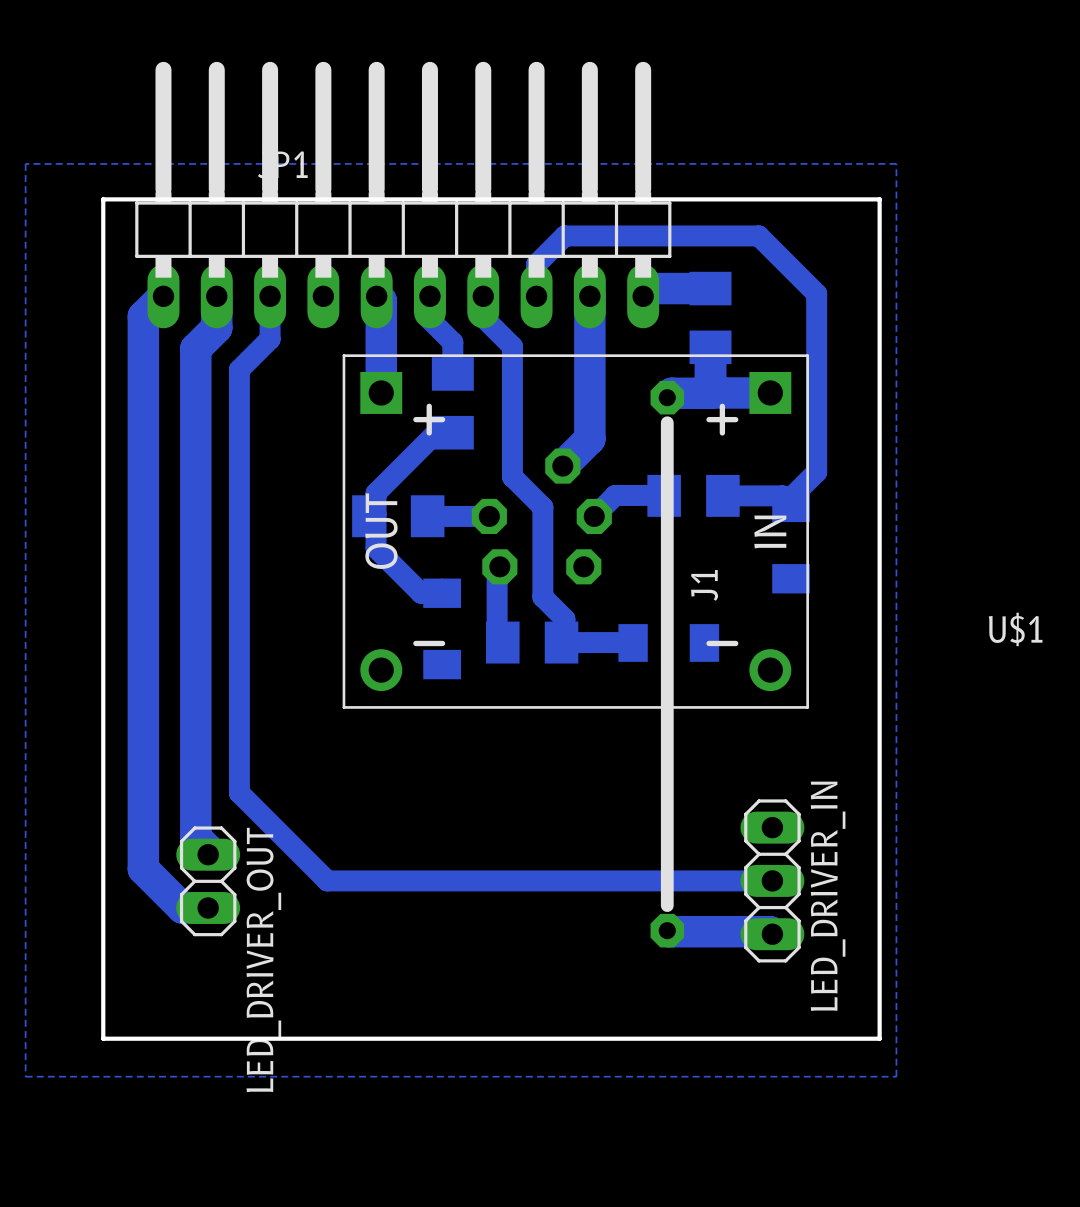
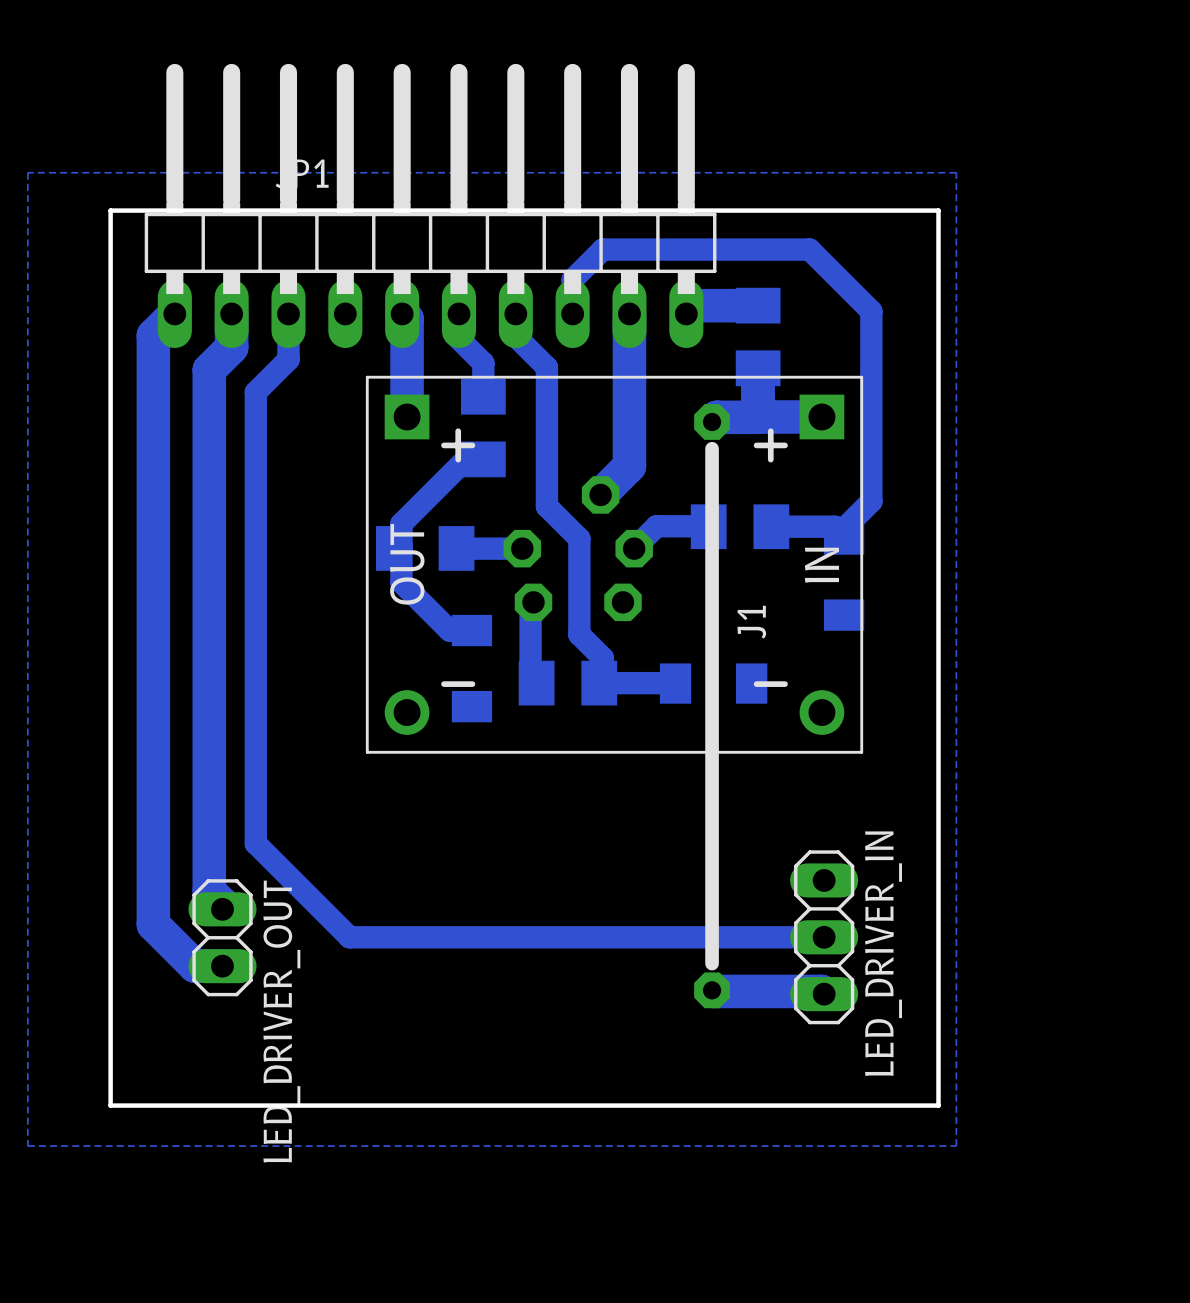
U$1 name: U$1 (1015, 629) -> none

